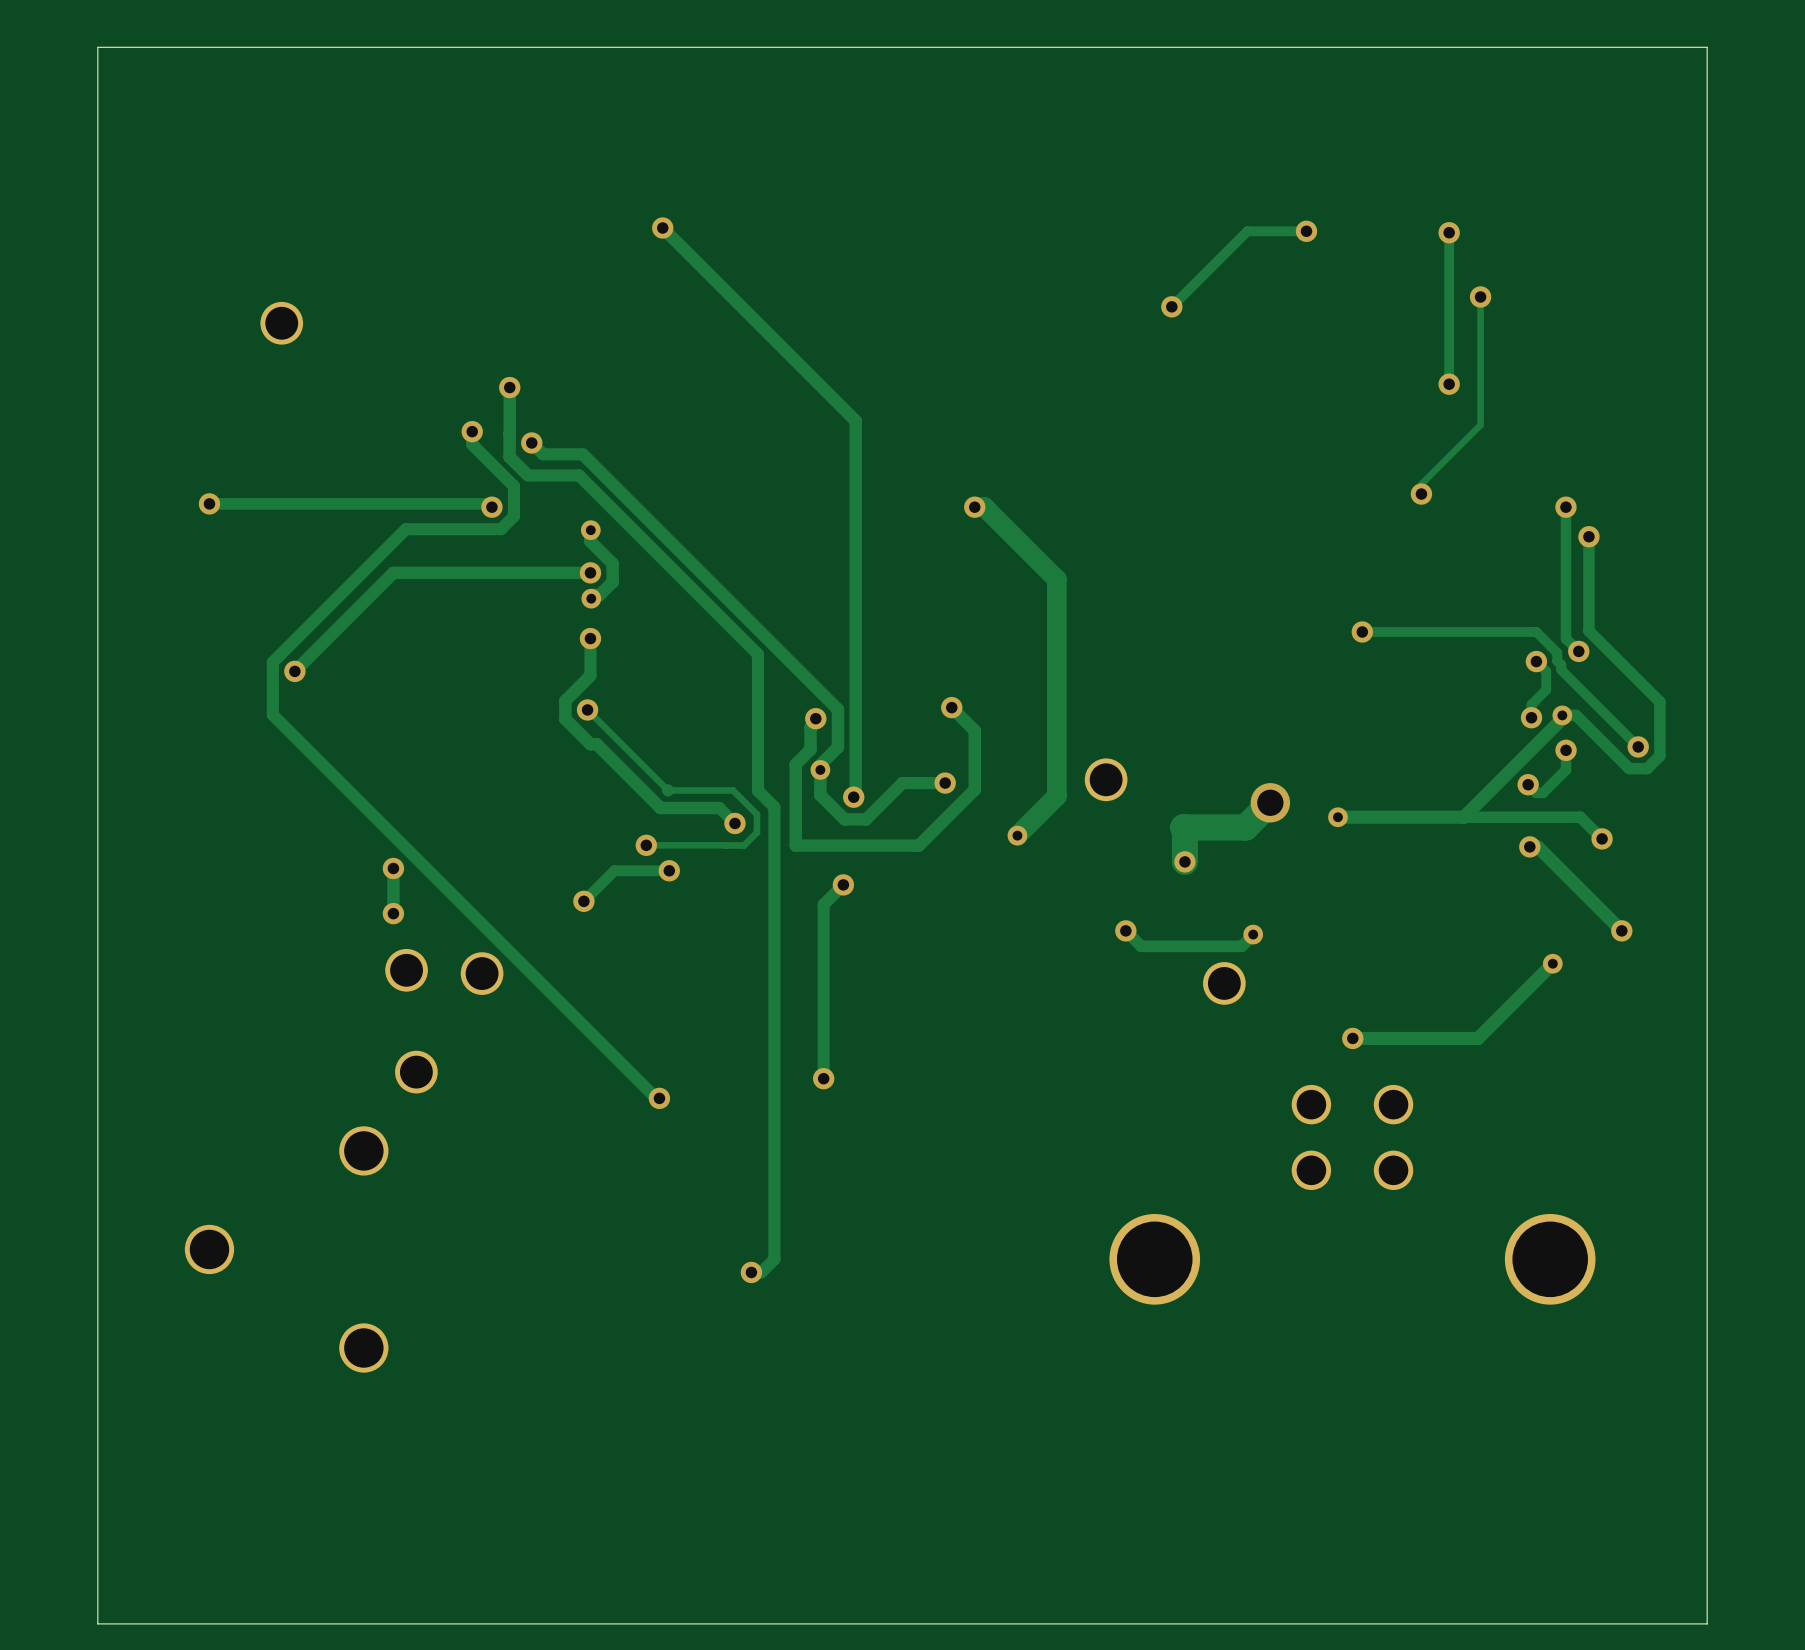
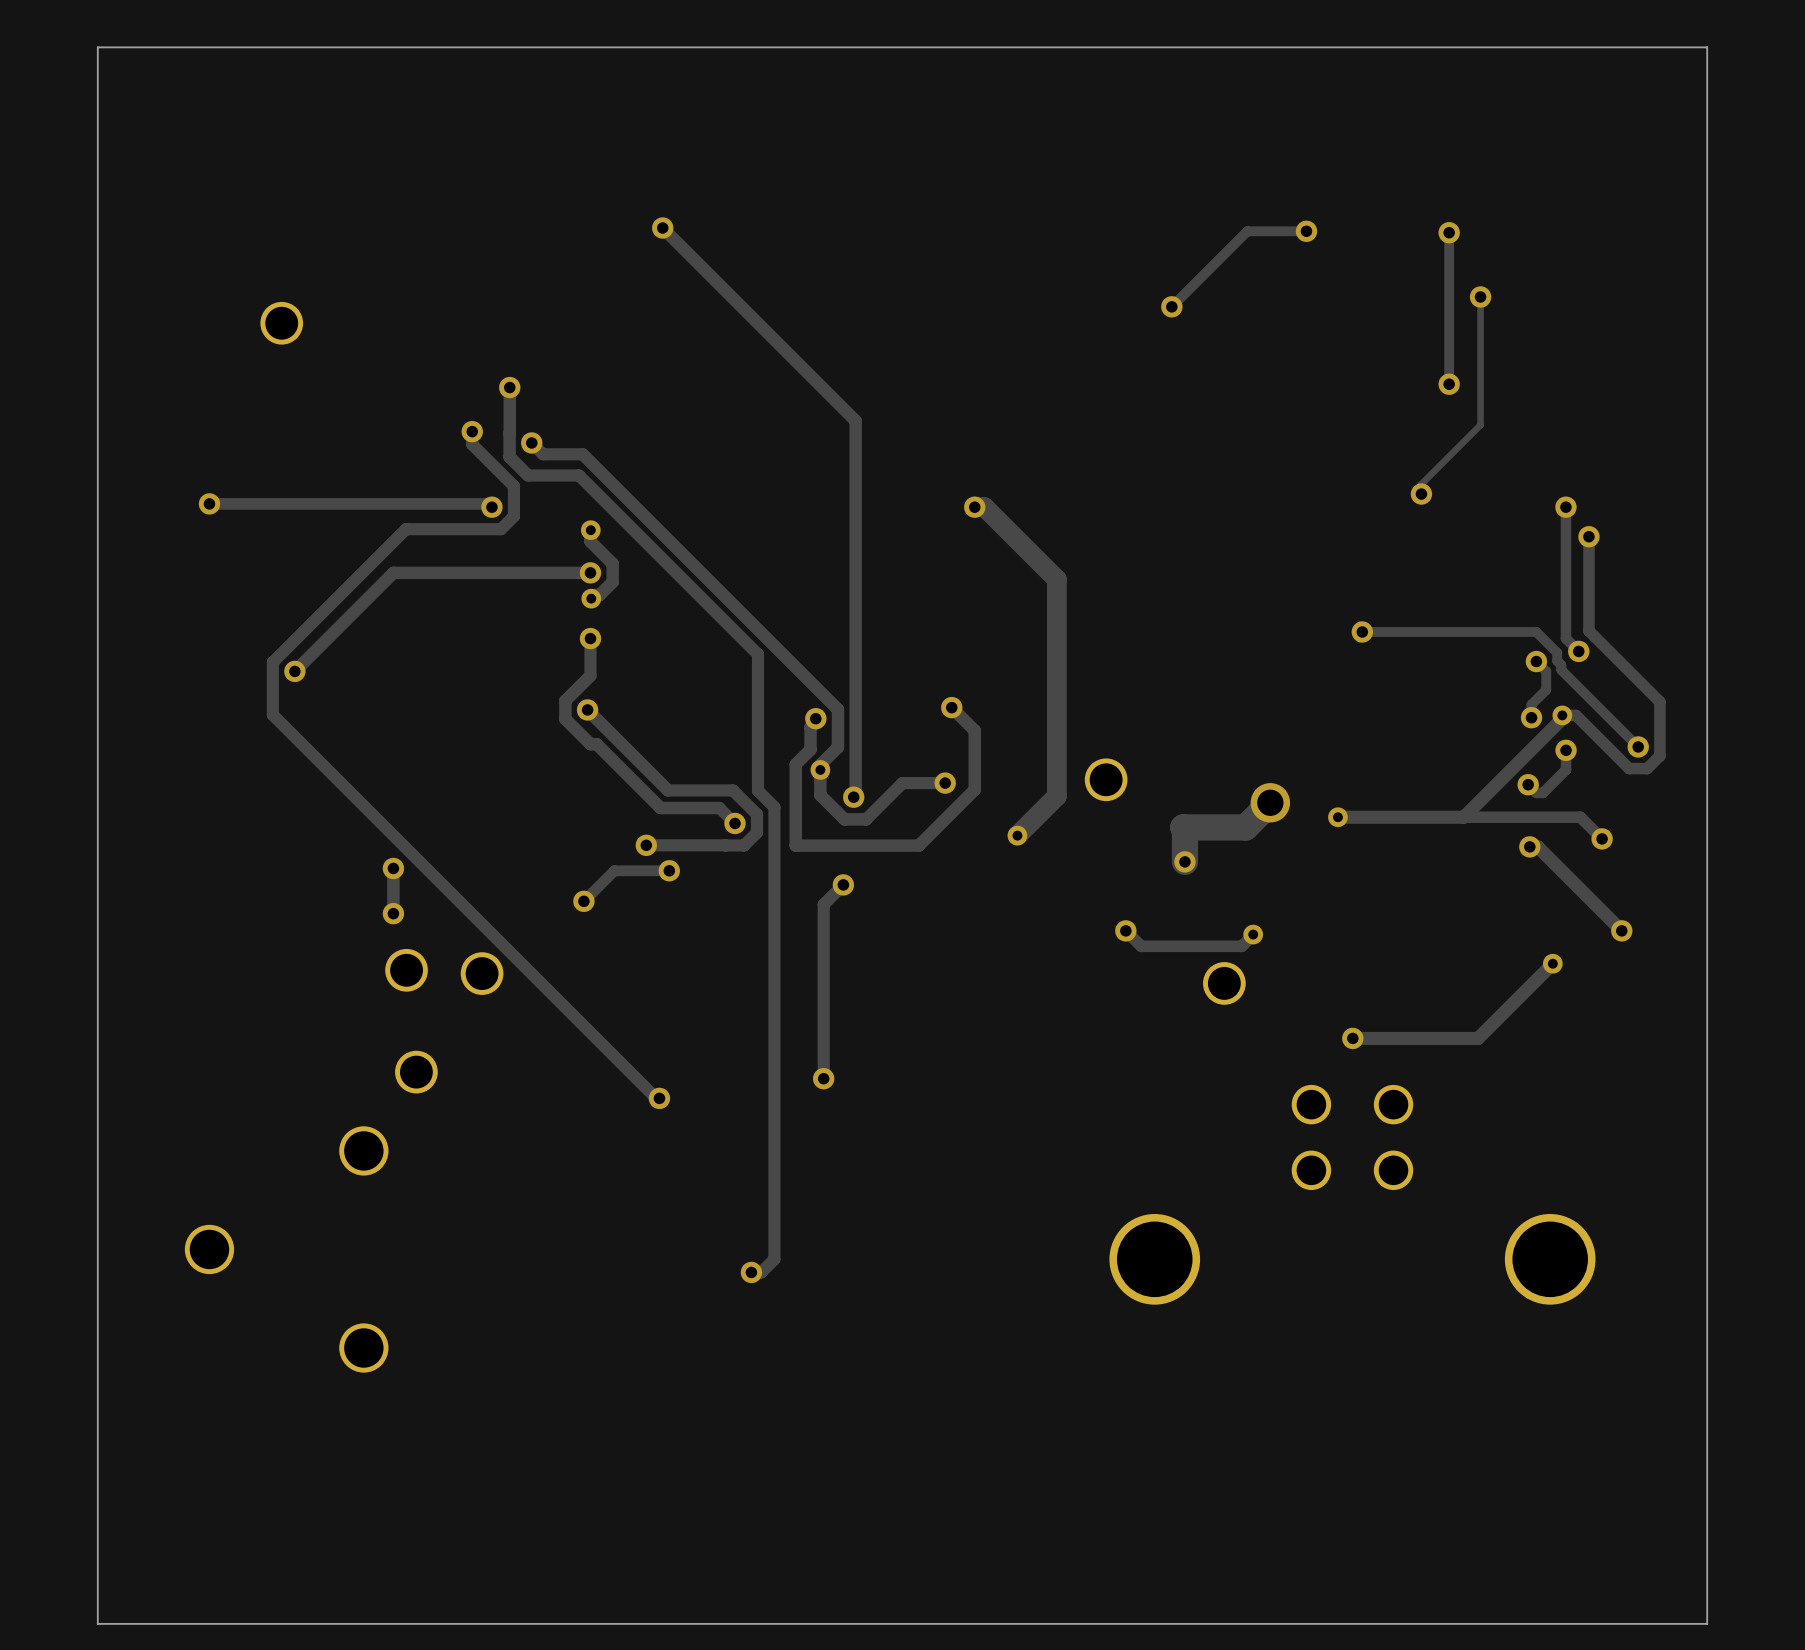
track width: thin (587, 709) (667, 790) (733, 790) (757, 814) (757, 832) (744, 845) (646, 845) -> thick (587, 709) (667, 790) (733, 790) (757, 814) (757, 832) (744, 845) (646, 845)

